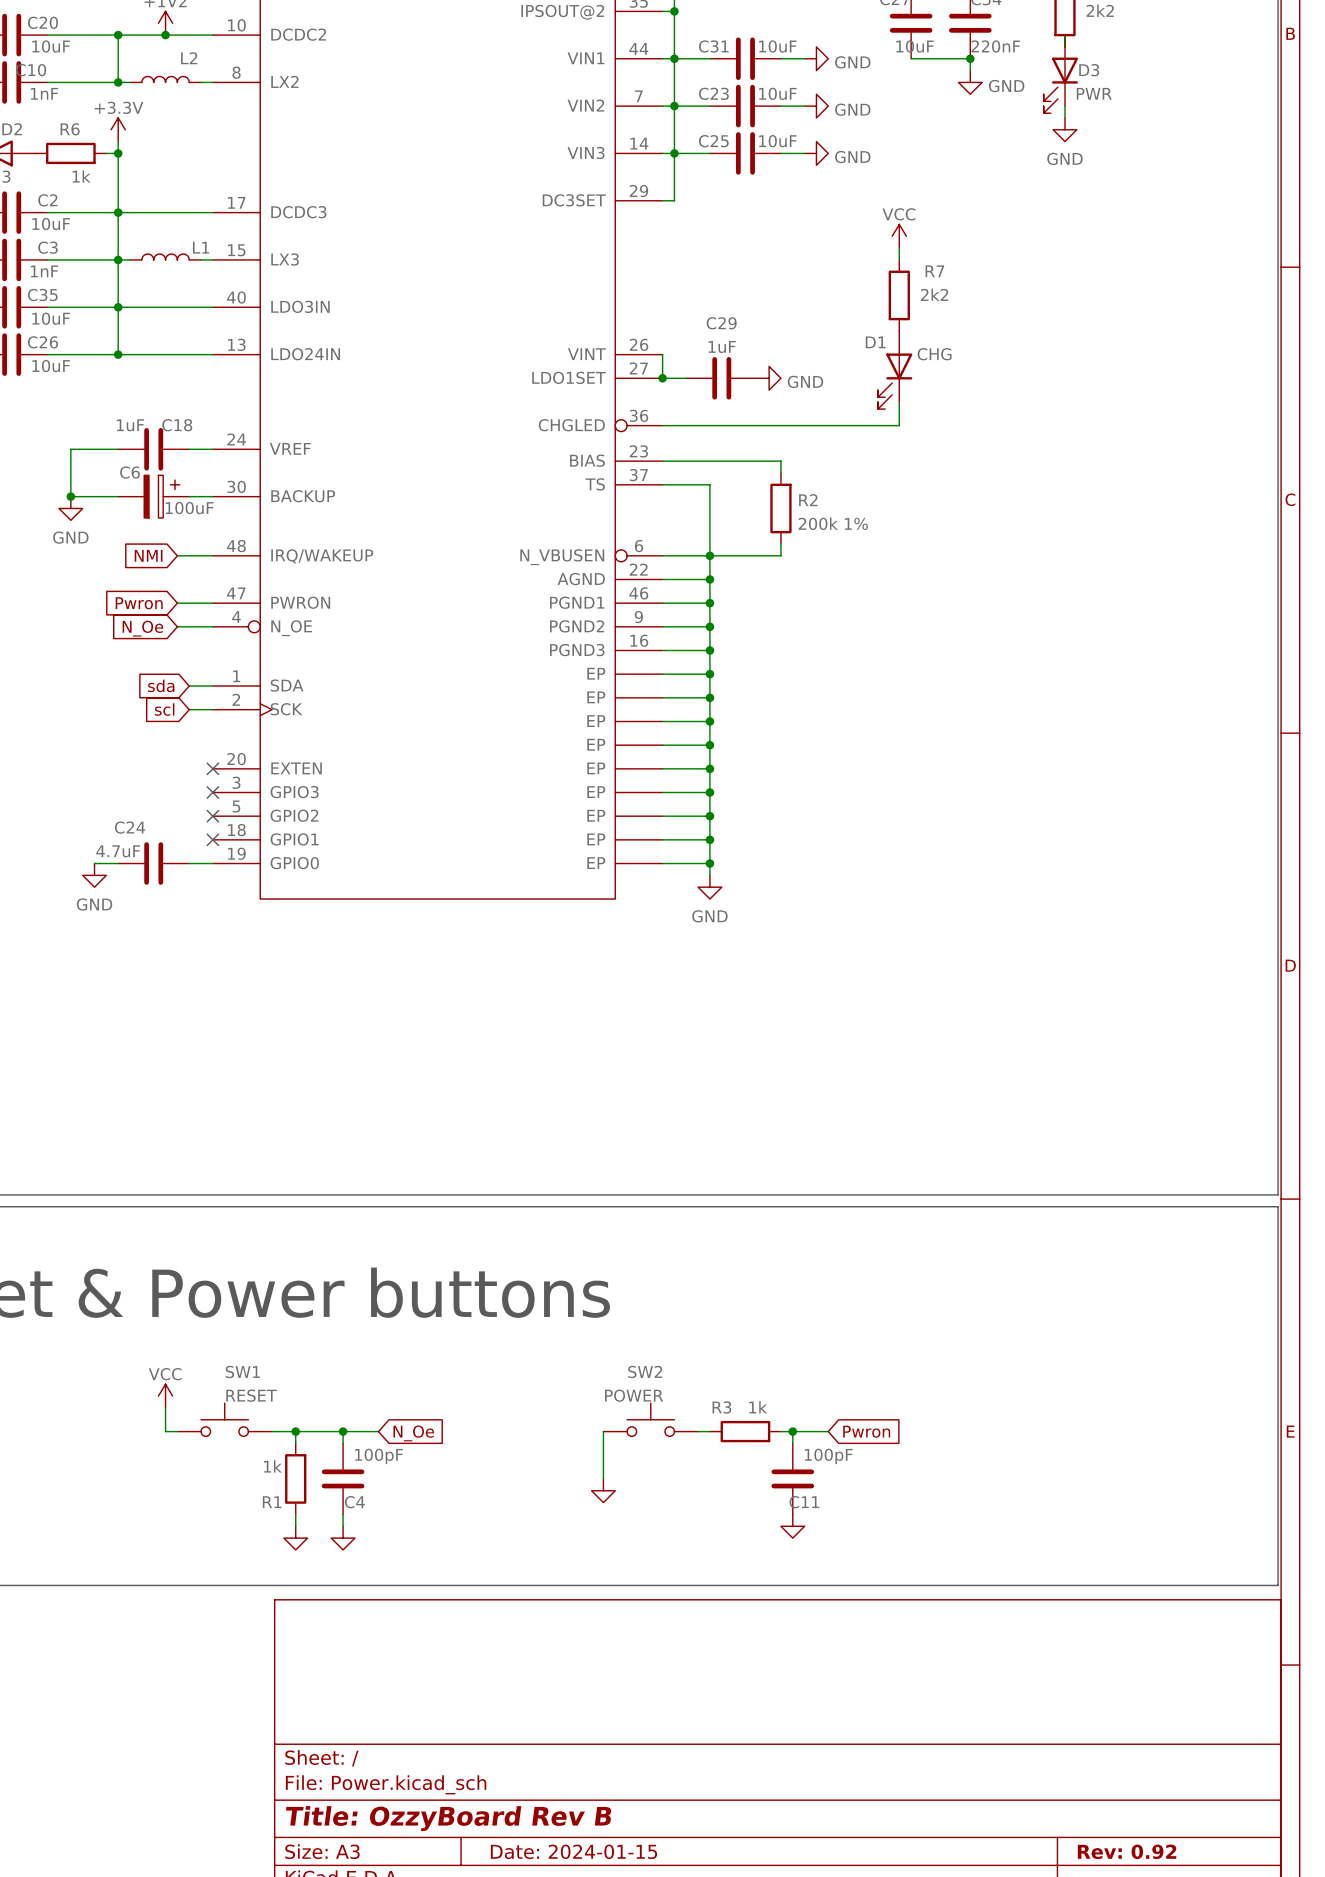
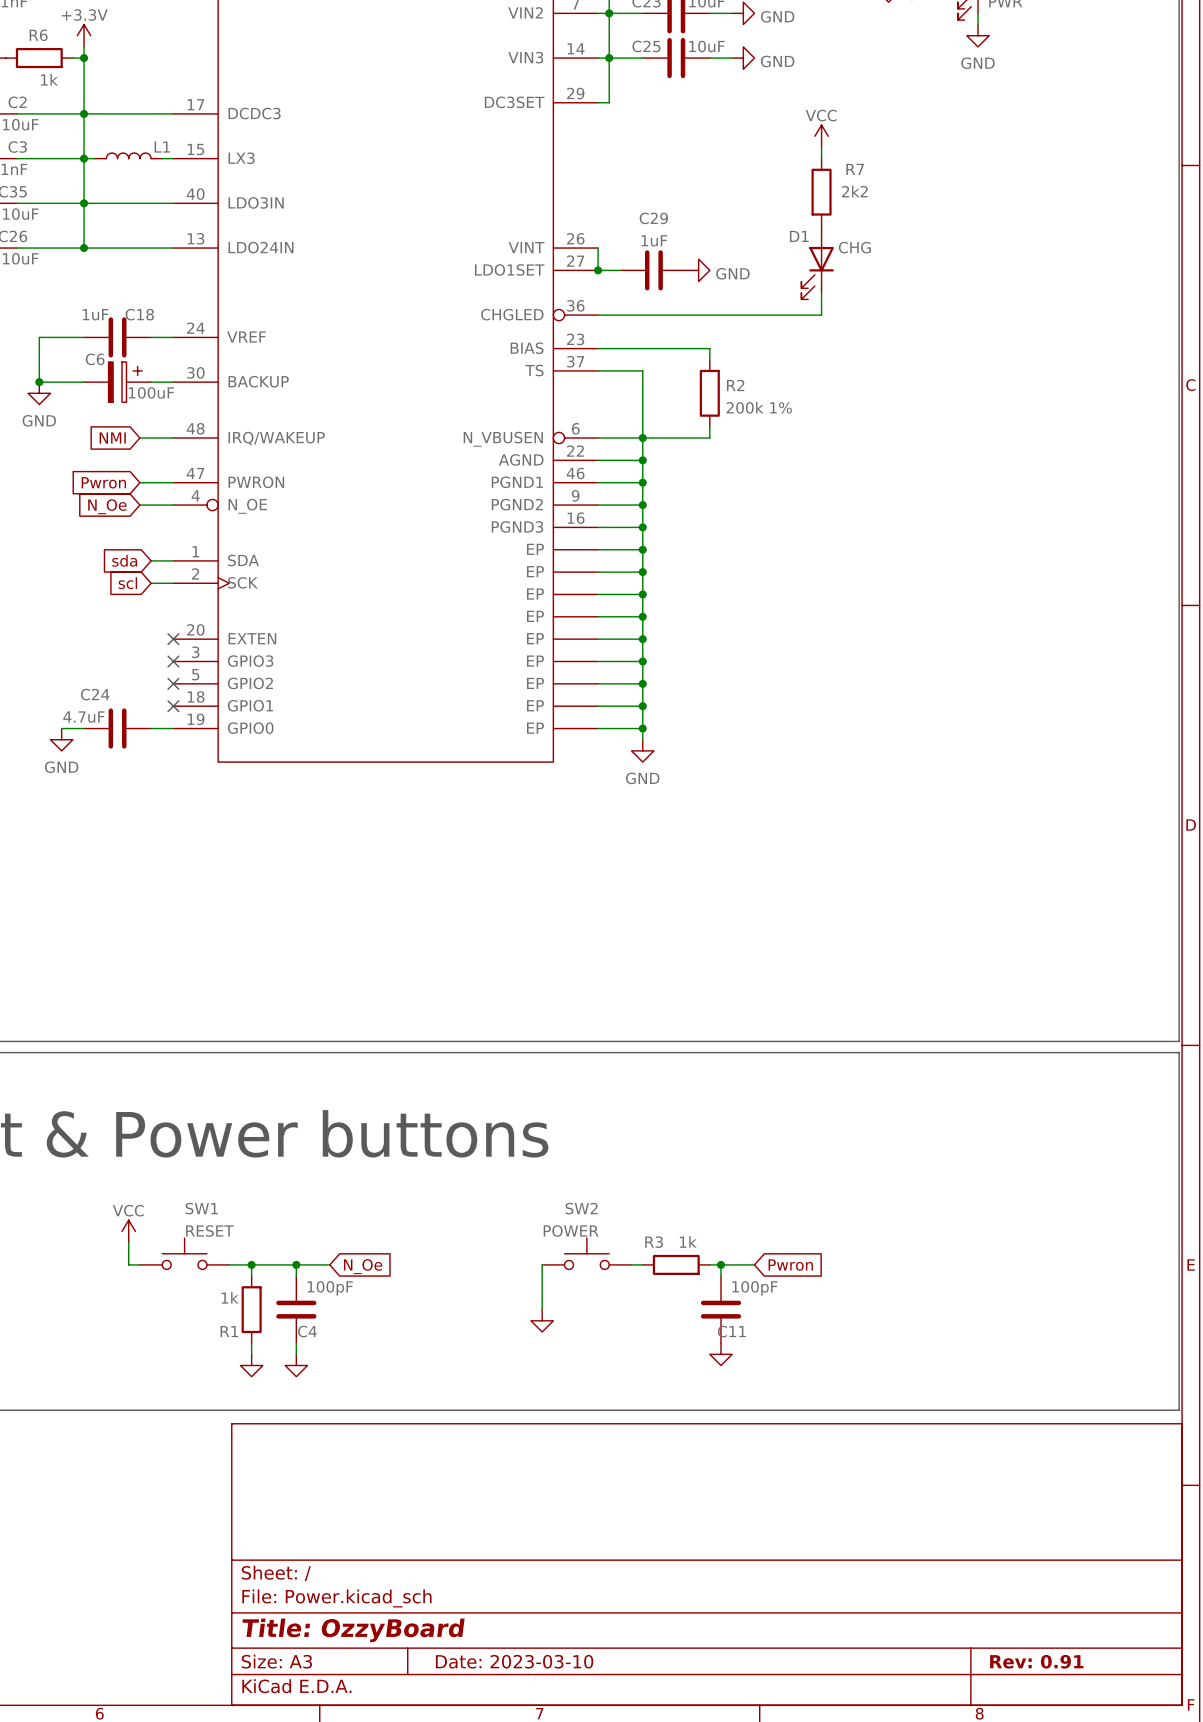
title block: Title: OzzyBoard Rev B (448, 1818) -> Title: OzzyBoard (353, 1630)
title block: Date: 2024-01-15 (574, 1851) -> Date: 2023-03-10 (514, 1661)
title block: Rev: 0.92 (1127, 1851) -> Rev: 0.91 (1036, 1661)

